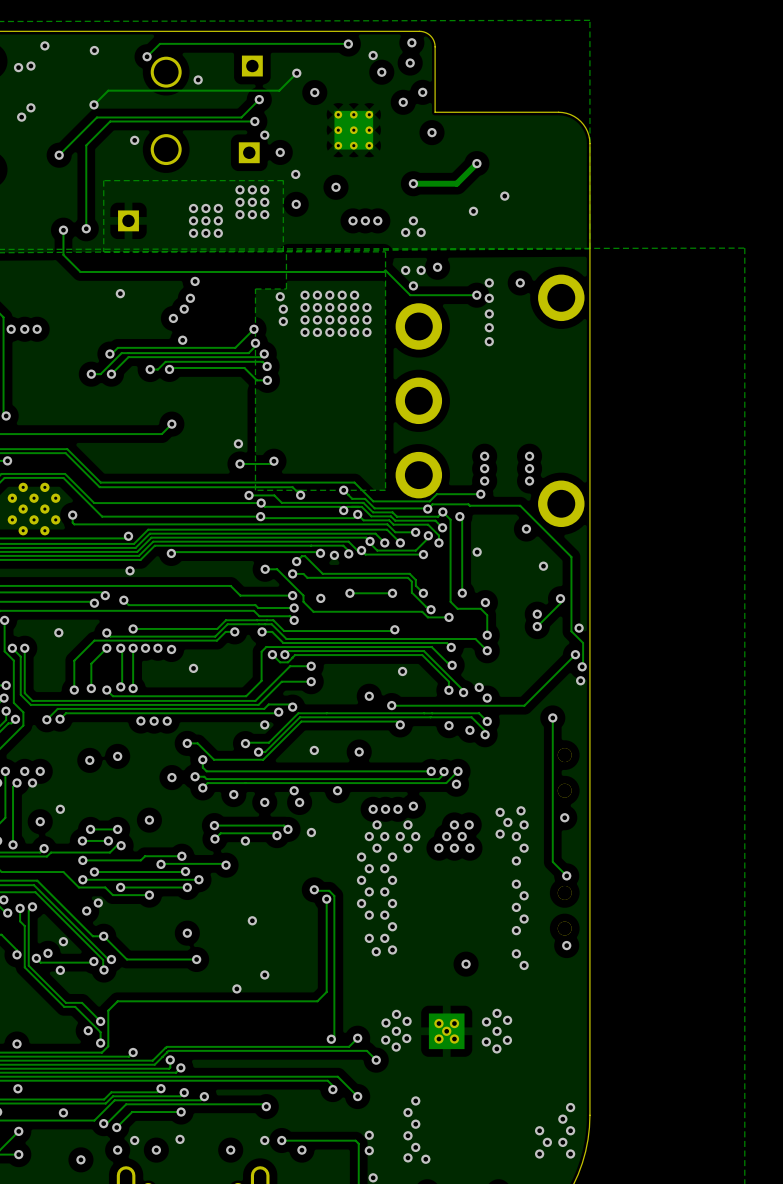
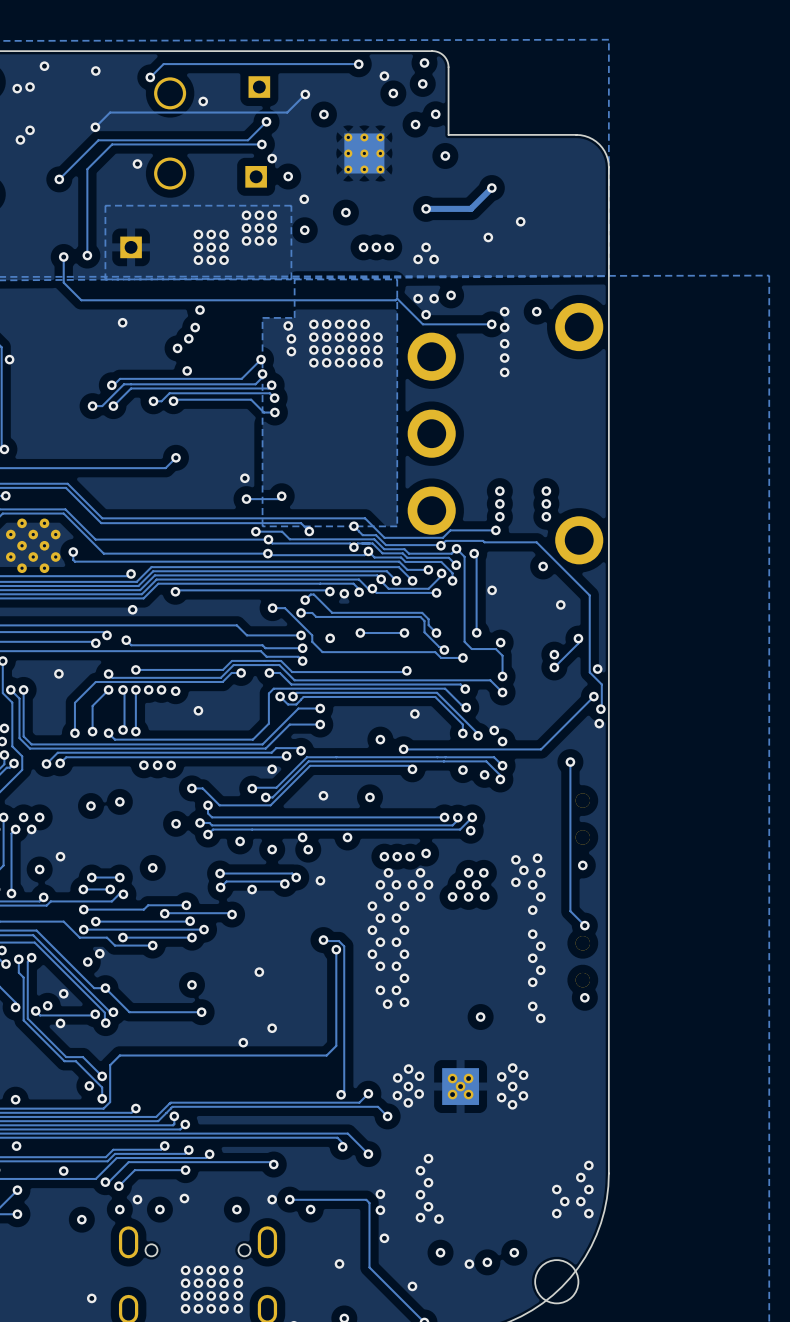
via: (24, 329) -> none
via: (37, 329) -> none

